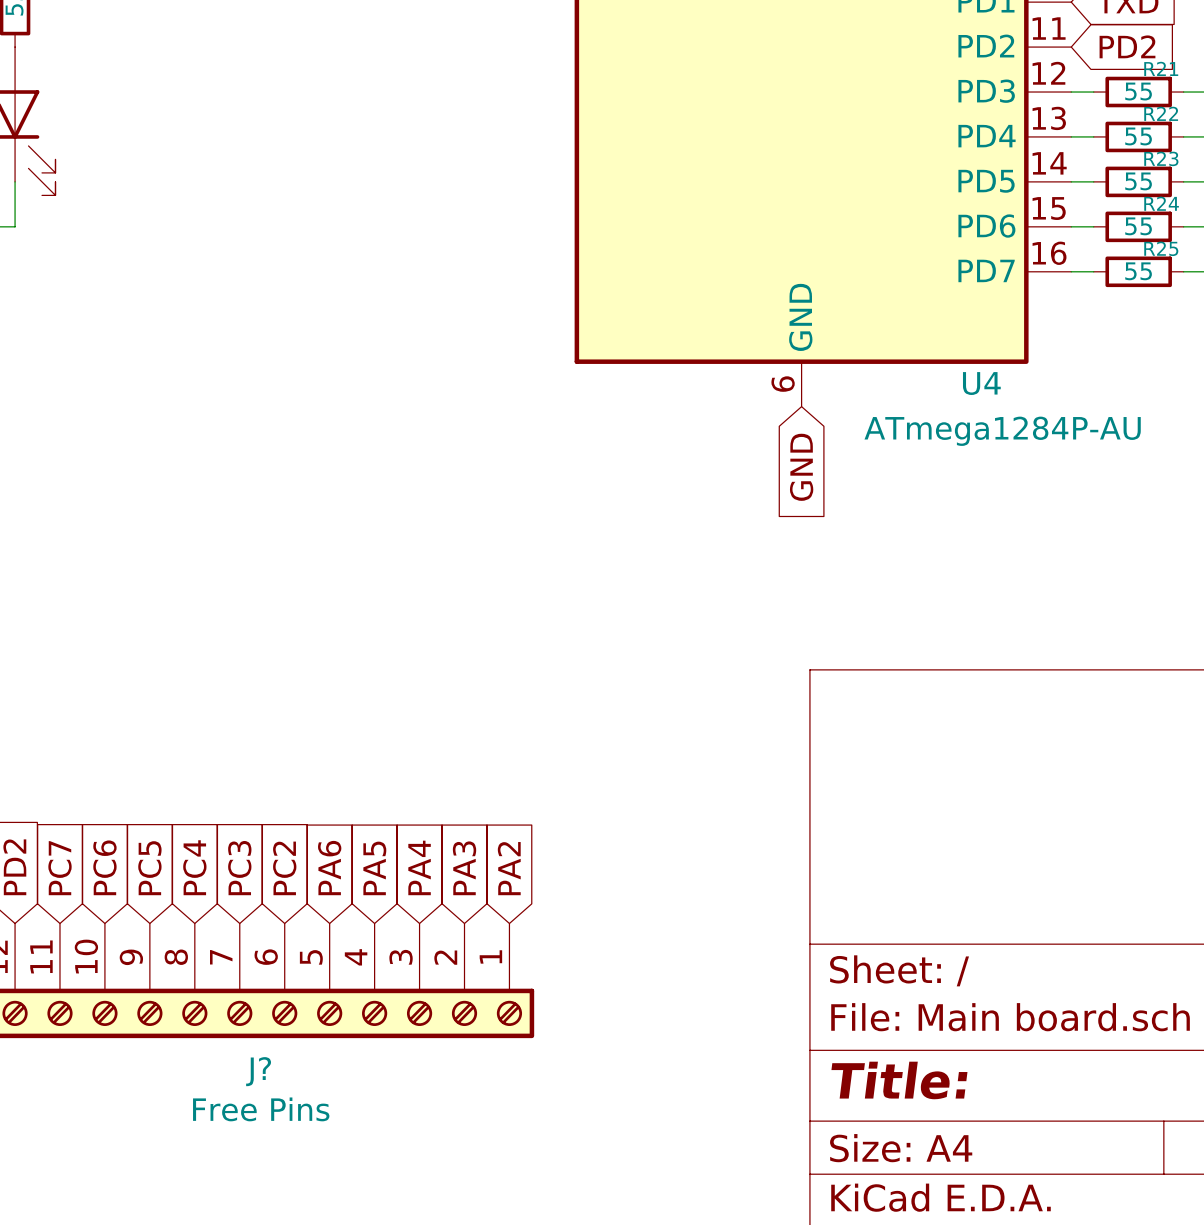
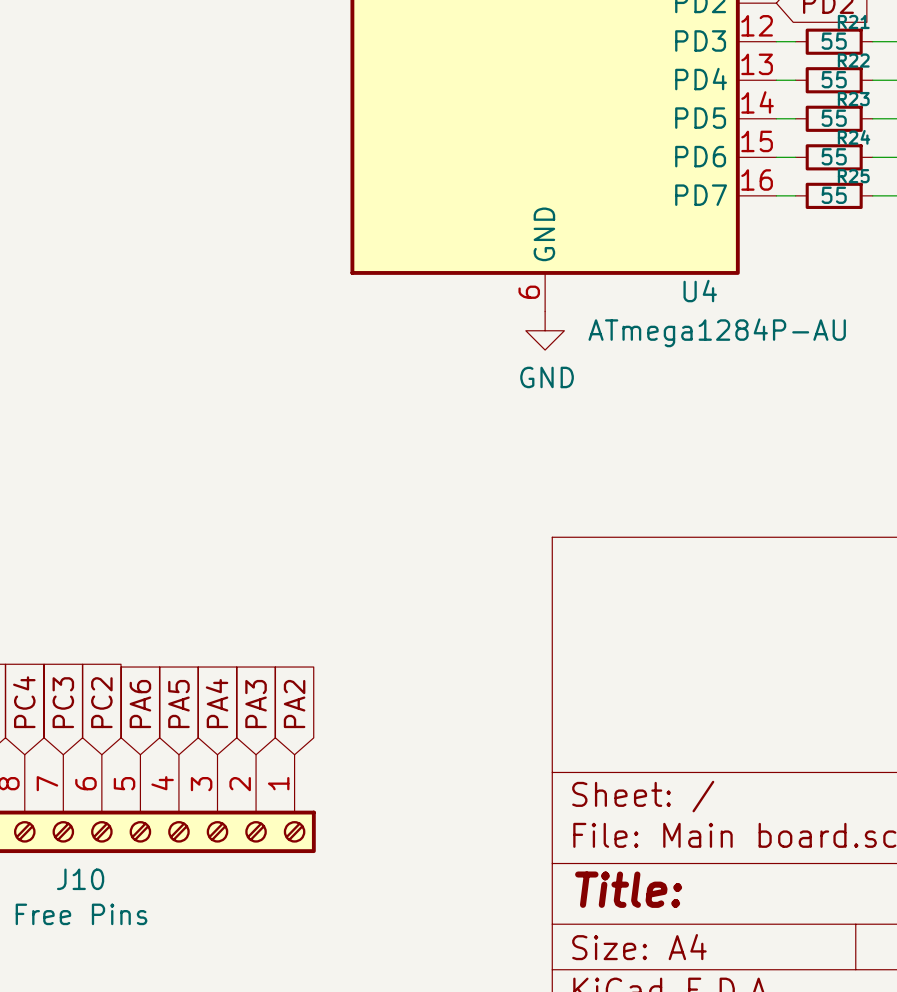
power symbol: none -> GND (545, 330)
global label: GND (801, 467) -> none
J? name: J? (258, 1071) -> J10 (80, 879)

